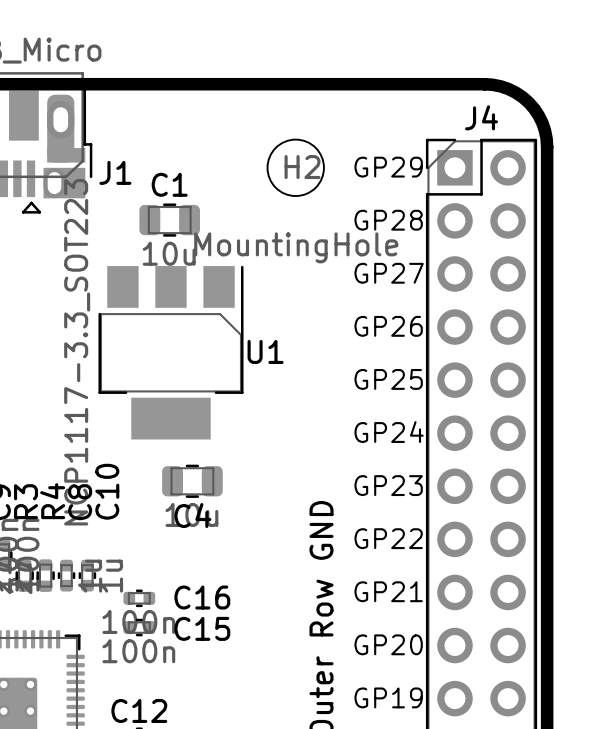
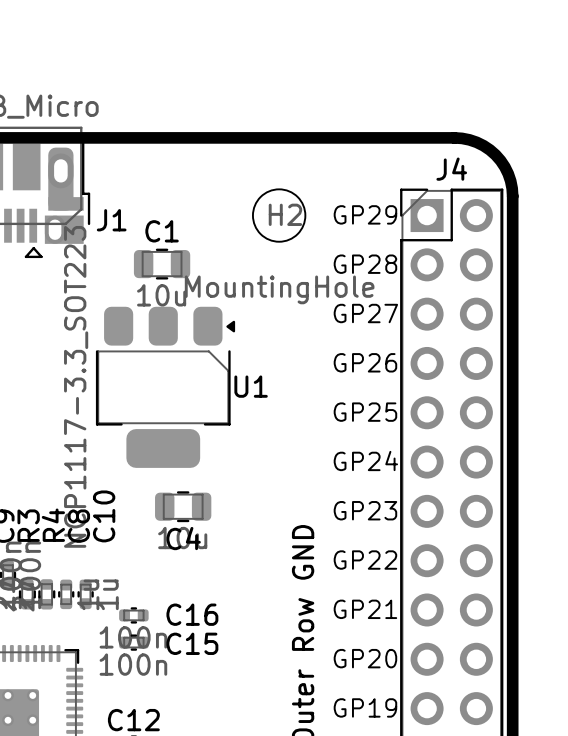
U1 footprint: [98, 265, 244, 440] -> [95, 306, 236, 468]

